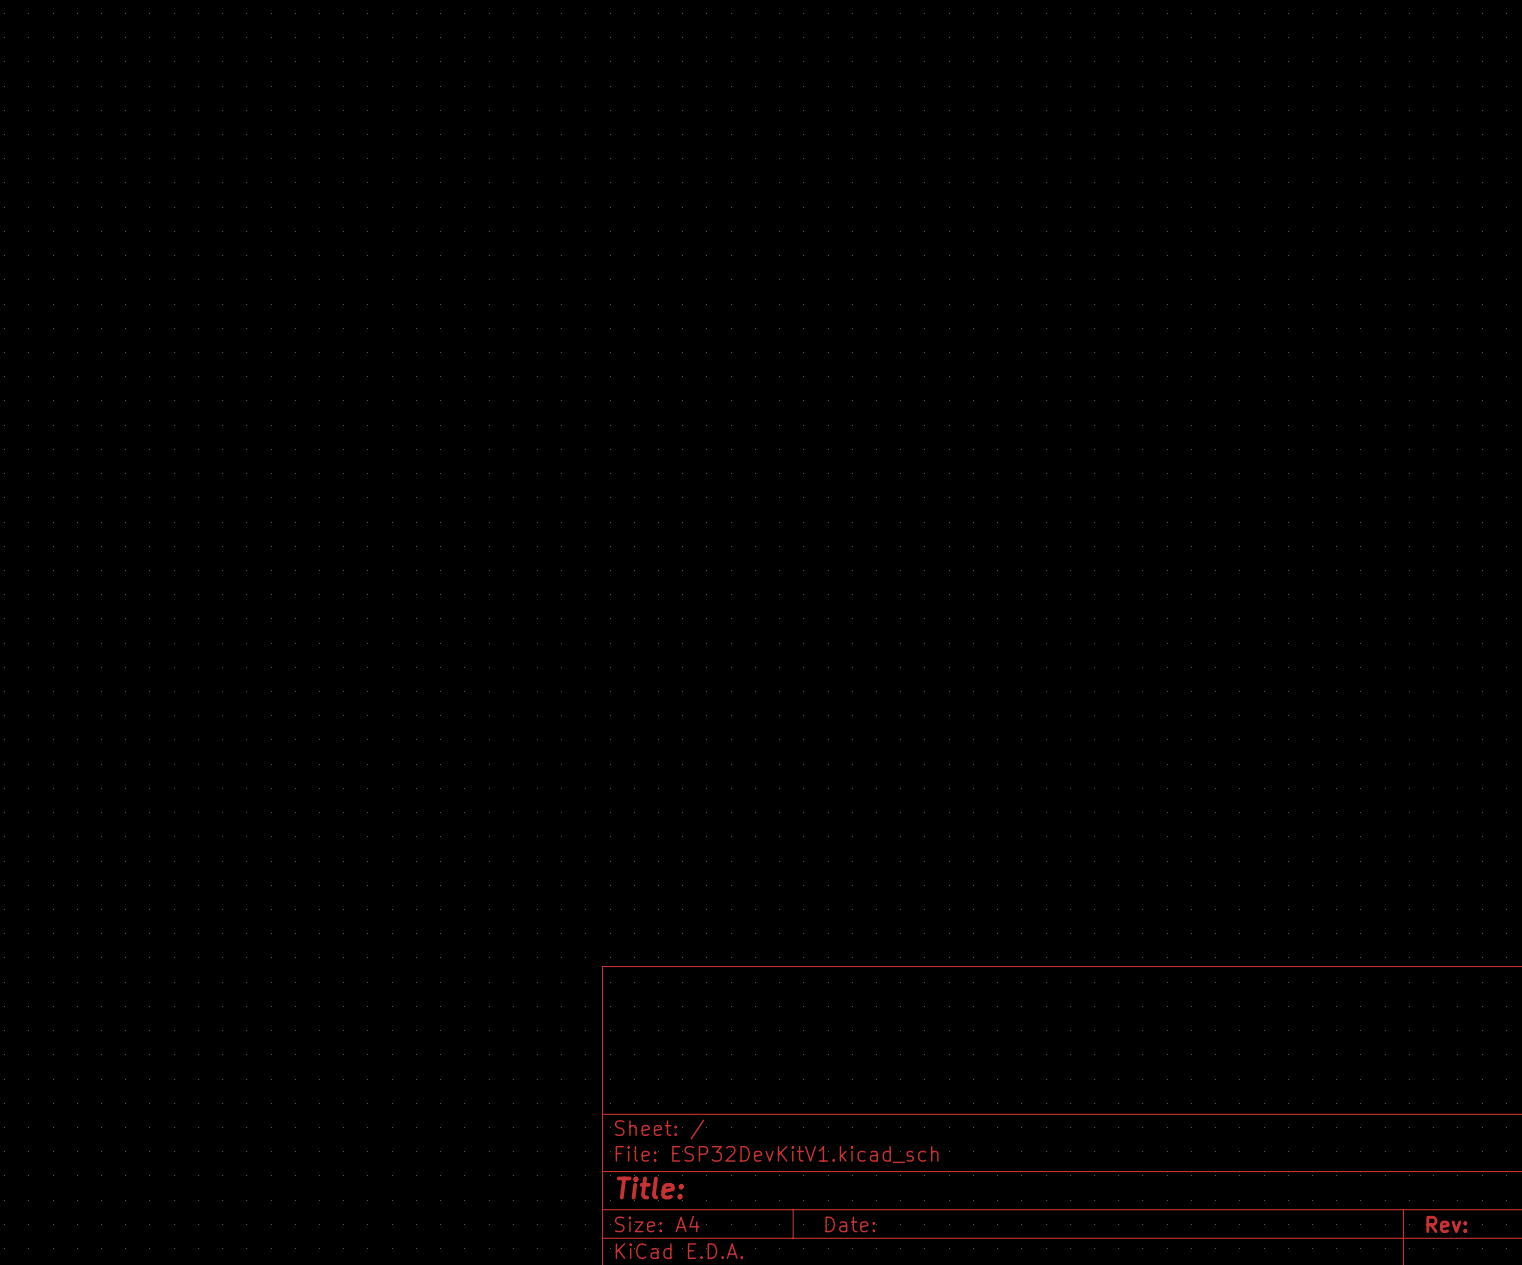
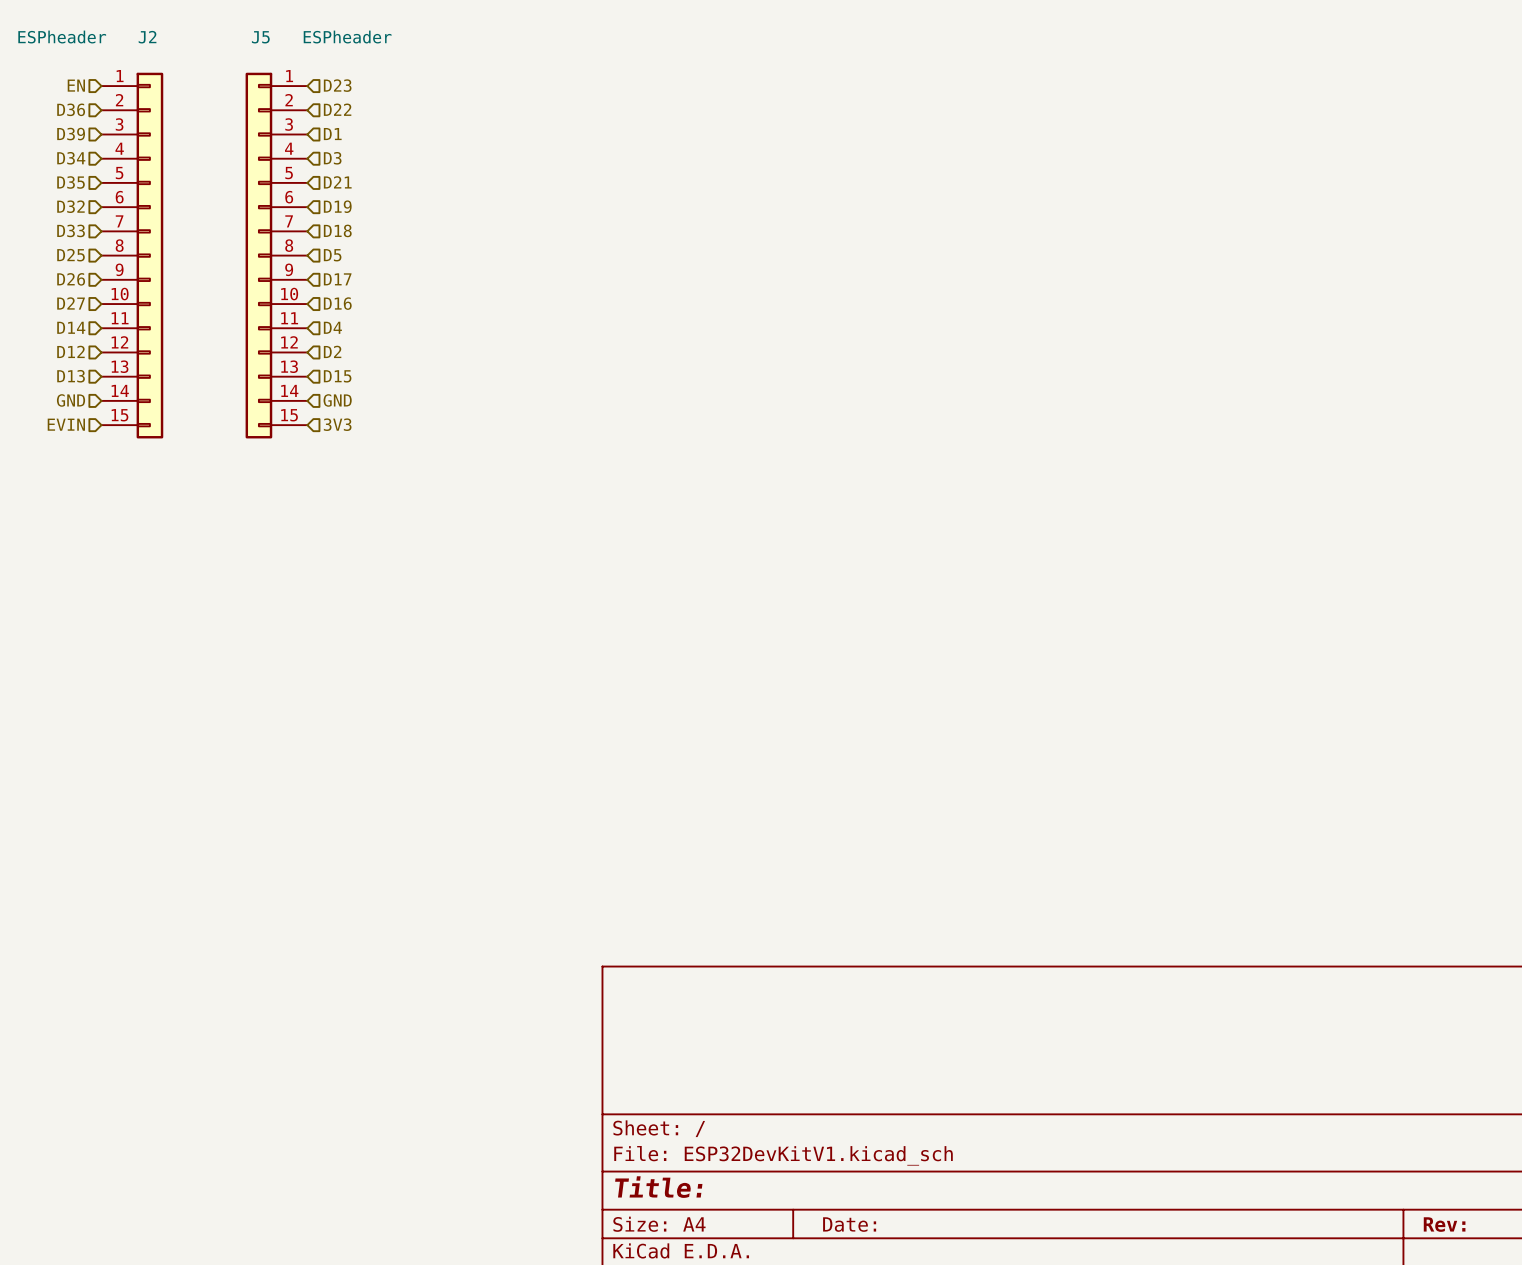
hierarchical label: none -> EN (76, 85)
hierarchical label: none -> D23 (337, 85)
hierarchical label: none -> D36 (71, 109)
hierarchical label: none -> D22 (337, 109)
hierarchical label: none -> D39 (71, 134)
hierarchical label: none -> D1 (332, 134)
hierarchical label: none -> D34 (71, 158)
hierarchical label: none -> D3 (332, 158)
hierarchical label: none -> D35 (71, 182)
hierarchical label: none -> D21 (337, 182)
hierarchical label: none -> D32 (70, 206)
hierarchical label: none -> D19 (337, 206)
hierarchical label: none -> D33 (71, 230)
hierarchical label: none -> D18 (337, 230)
hierarchical label: none -> D25 (71, 255)
J2: none -> ESPheader (132, 255)
J5: none -> ESPheader (276, 255)
hierarchical label: none -> D5 (332, 255)
hierarchical label: none -> D26 (71, 279)
hierarchical label: none -> D17 (337, 279)
hierarchical label: none -> D27 (71, 303)
hierarchical label: none -> D16 (337, 303)
hierarchical label: none -> D14 (71, 327)
hierarchical label: none -> D4 (332, 327)
hierarchical label: none -> D12 (70, 351)
hierarchical label: none -> D2 (332, 351)
hierarchical label: none -> D13 (71, 376)
hierarchical label: none -> D15 (337, 376)
hierarchical label: none -> GND (71, 400)
hierarchical label: none -> GND (337, 400)
hierarchical label: none -> EVIN (66, 424)
hierarchical label: none -> 3V3 (337, 424)

